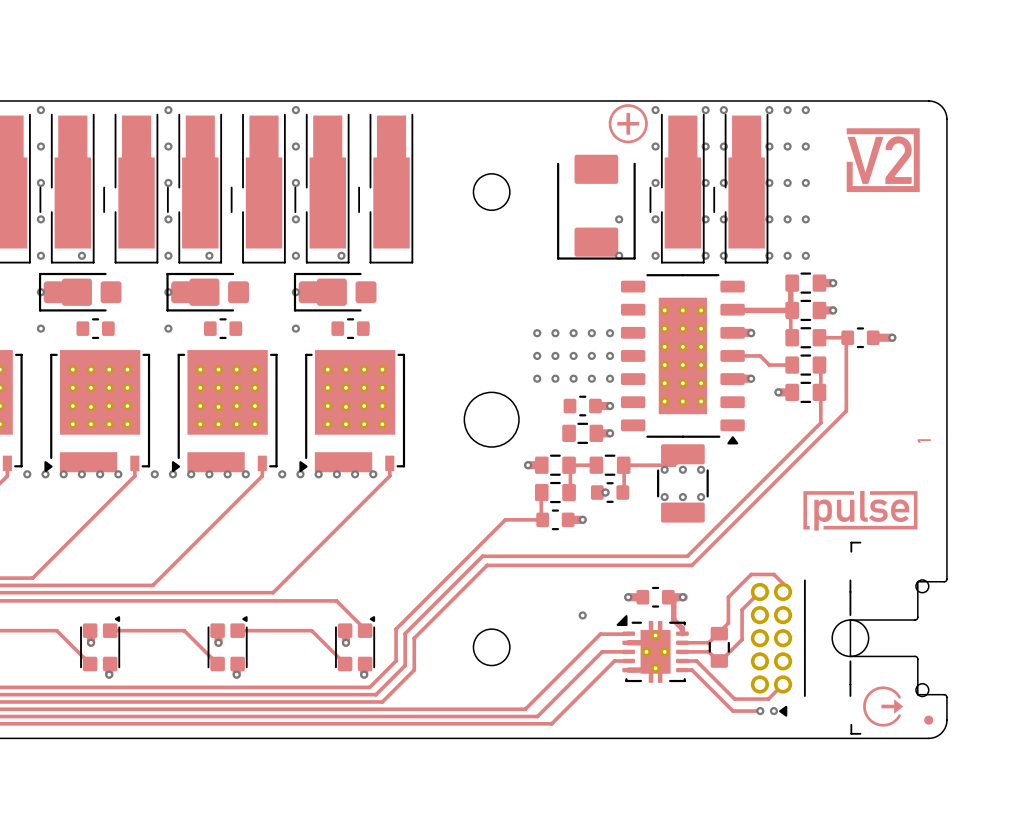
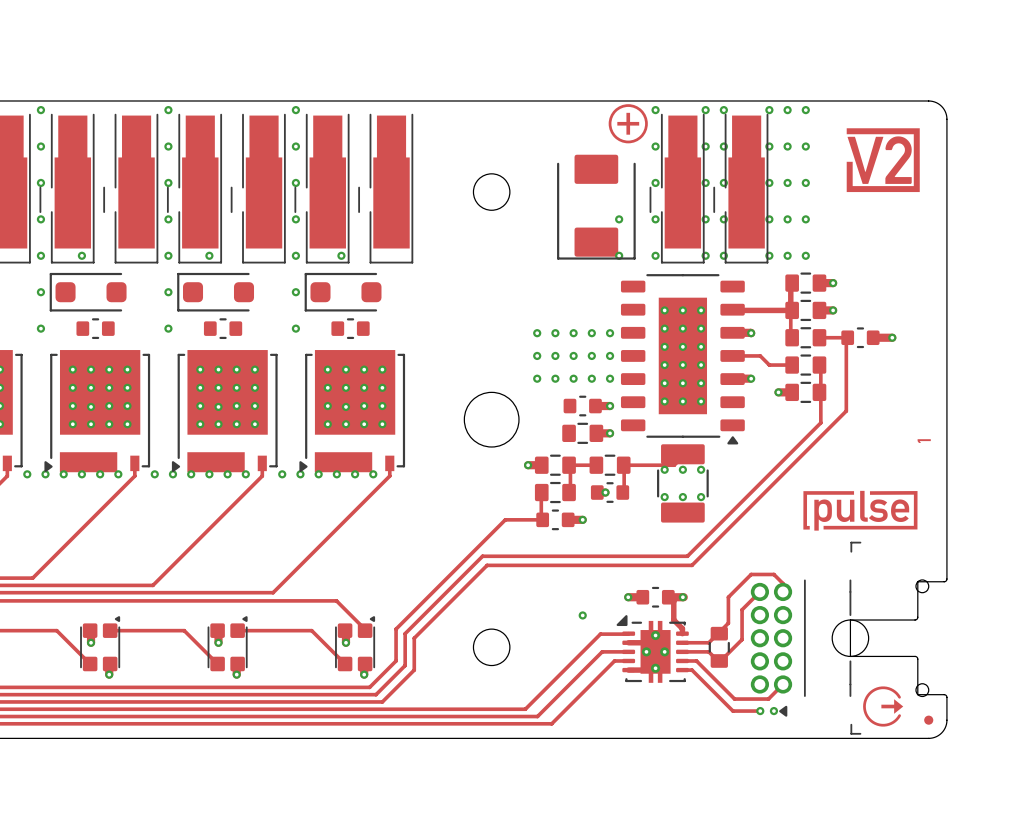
part footprint: [38, 272, 122, 312] -> [49, 272, 127, 312]
part footprint: [166, 272, 250, 312] -> [177, 272, 255, 312]
part footprint: [293, 272, 377, 312] -> [304, 272, 382, 312]

